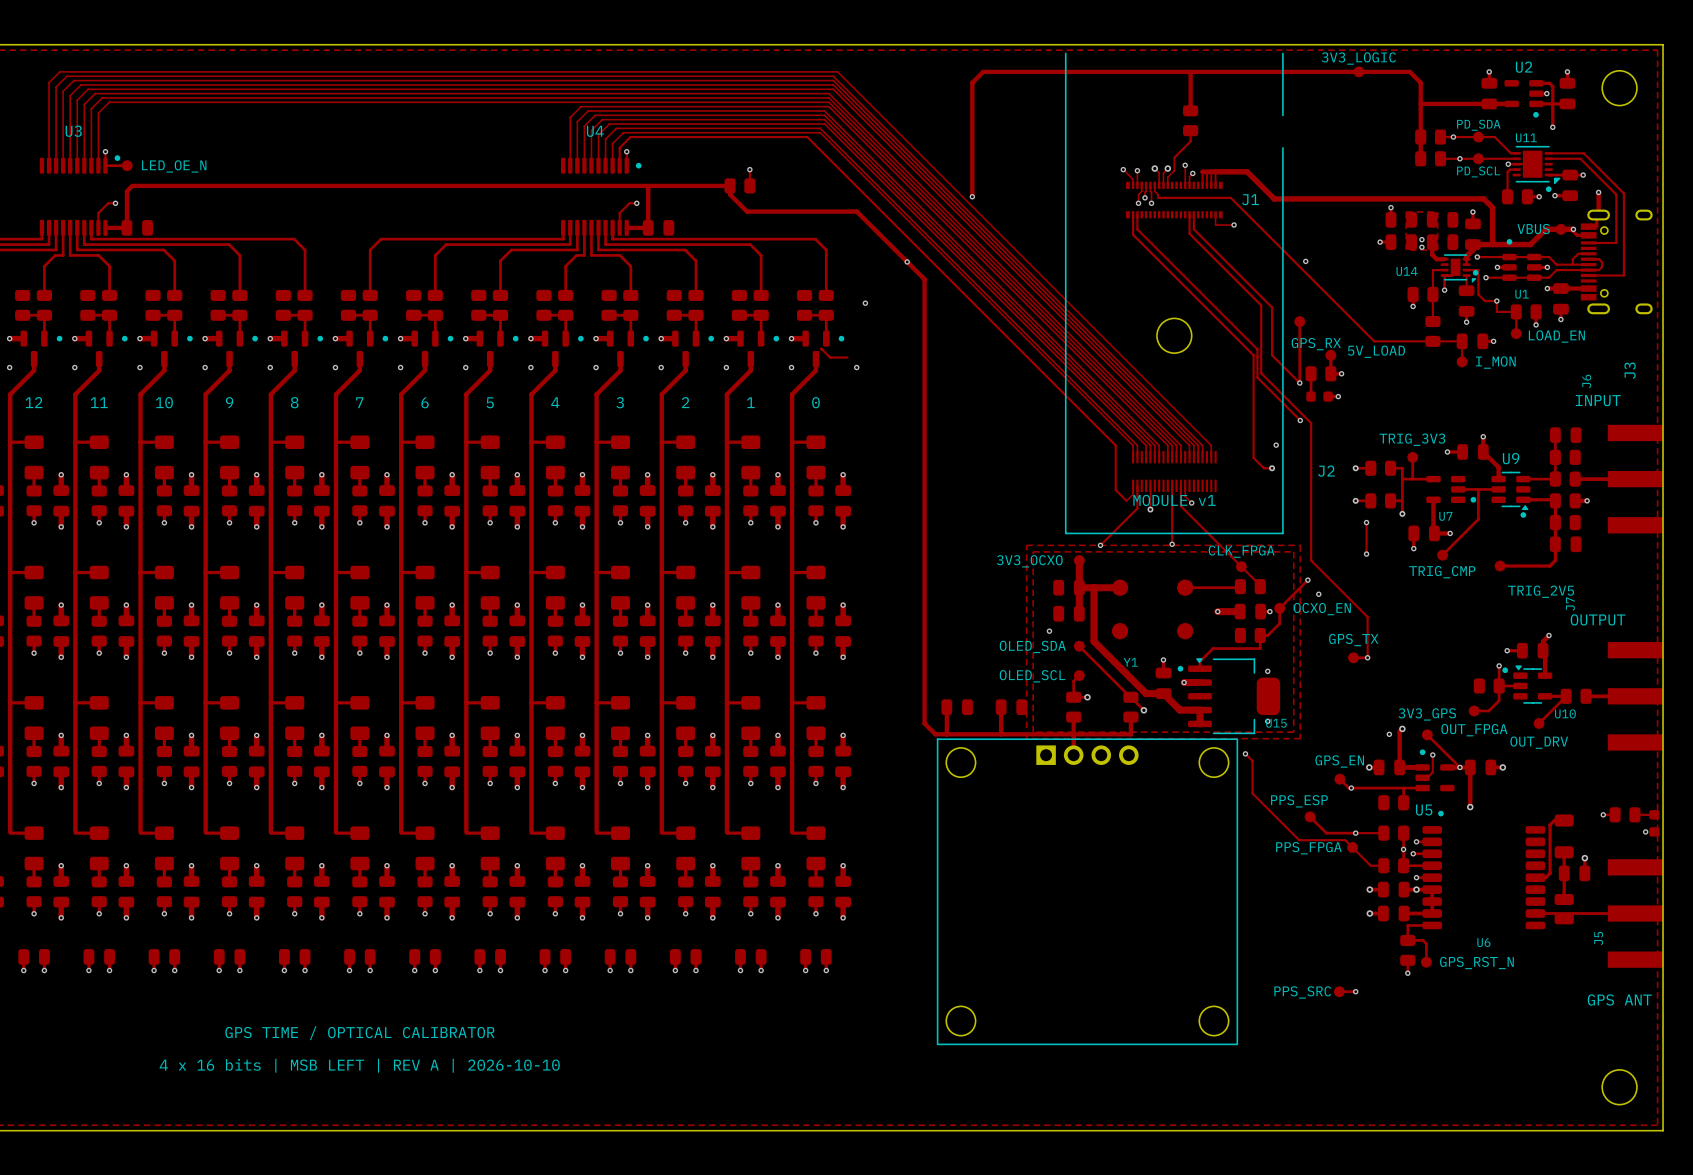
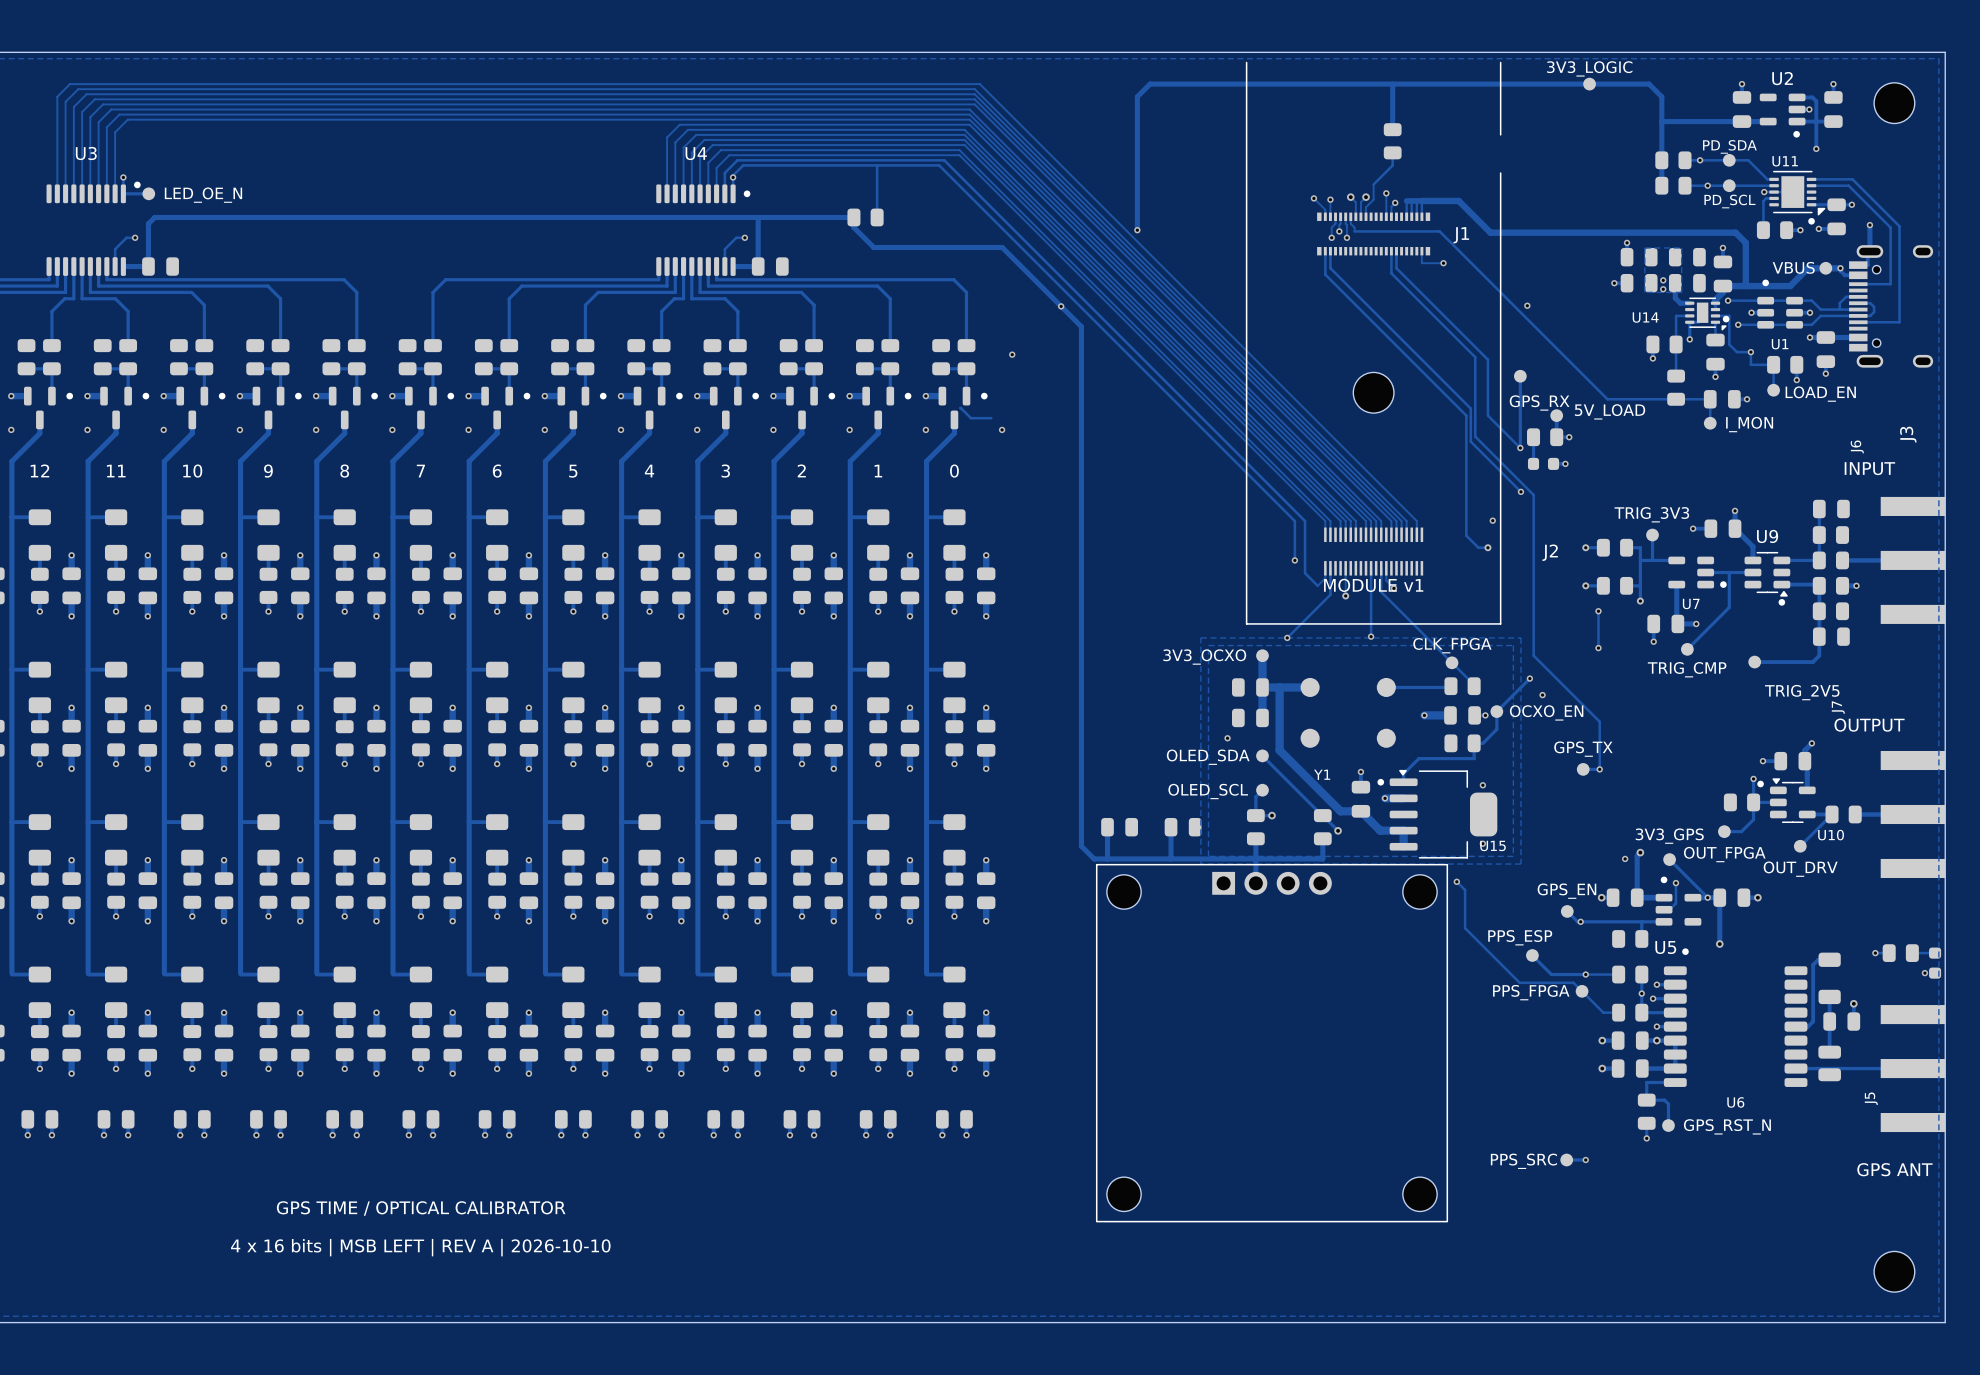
track: none -> (877, 165) (877, 198)
track: none -> (733, 177) (743, 165) (939, 165) (1294, 521) (1294, 560)
via: (749, 169) -> none
via: none -> (1294, 560)

